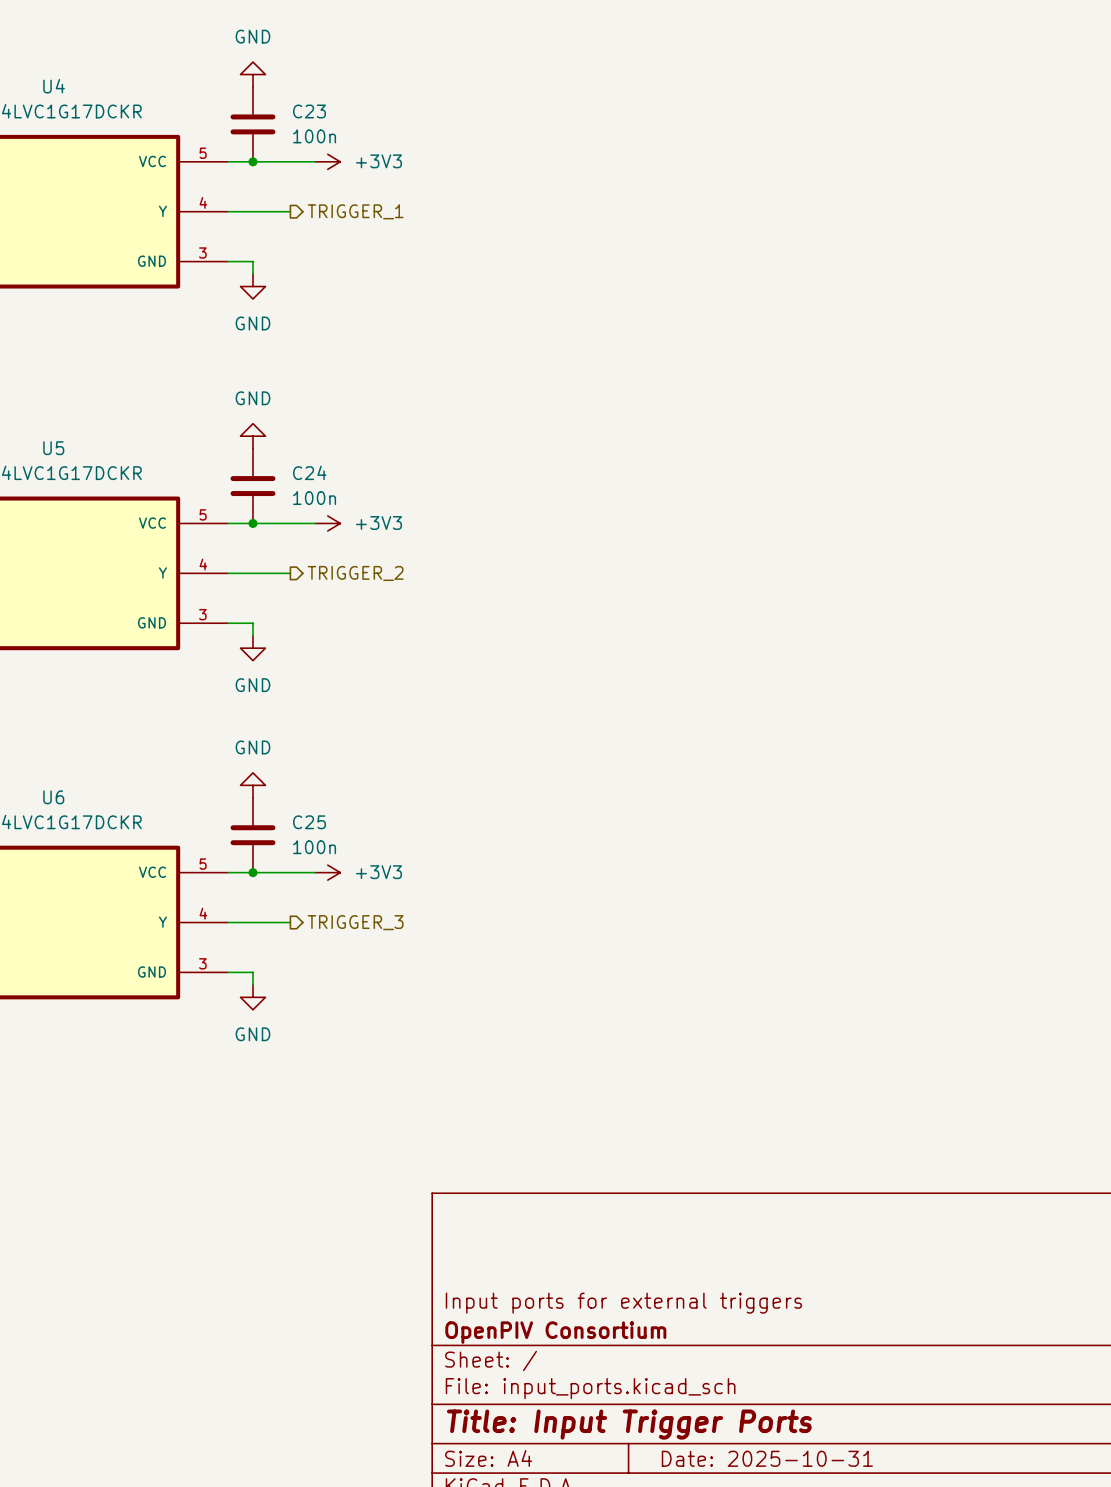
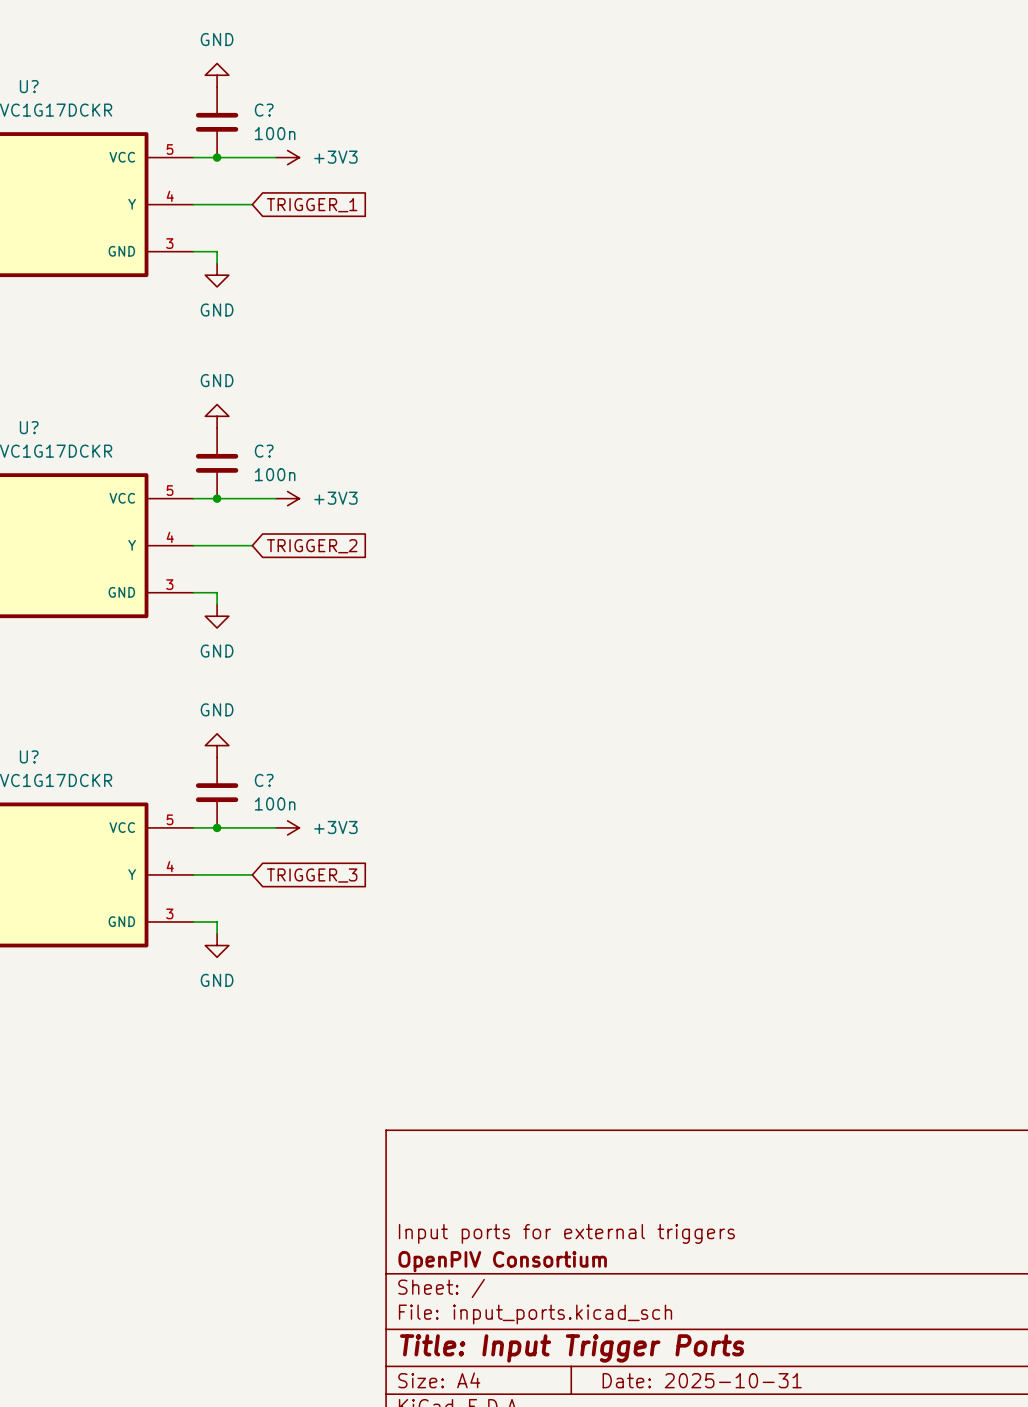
U4 name: U4 (54, 86) -> U? (29, 86)
C23 name: C23 (309, 111) -> C? (264, 110)
hierarchical label: TRIGGER_1 (355, 211) -> none
global label: none -> TRIGGER_1 (312, 205)
U5 name: U5 (53, 448) -> U? (29, 427)
C24 name: C24 (309, 472) -> C? (264, 451)
global label: none -> TRIGGER_2 (312, 546)
hierarchical label: TRIGGER_2 (355, 573) -> none
U6 name: U6 (53, 797) -> U? (29, 756)
C25 name: C25 (309, 822) -> C? (264, 780)
hierarchical label: TRIGGER_3 (355, 922) -> none
global label: none -> TRIGGER_3 (312, 875)

